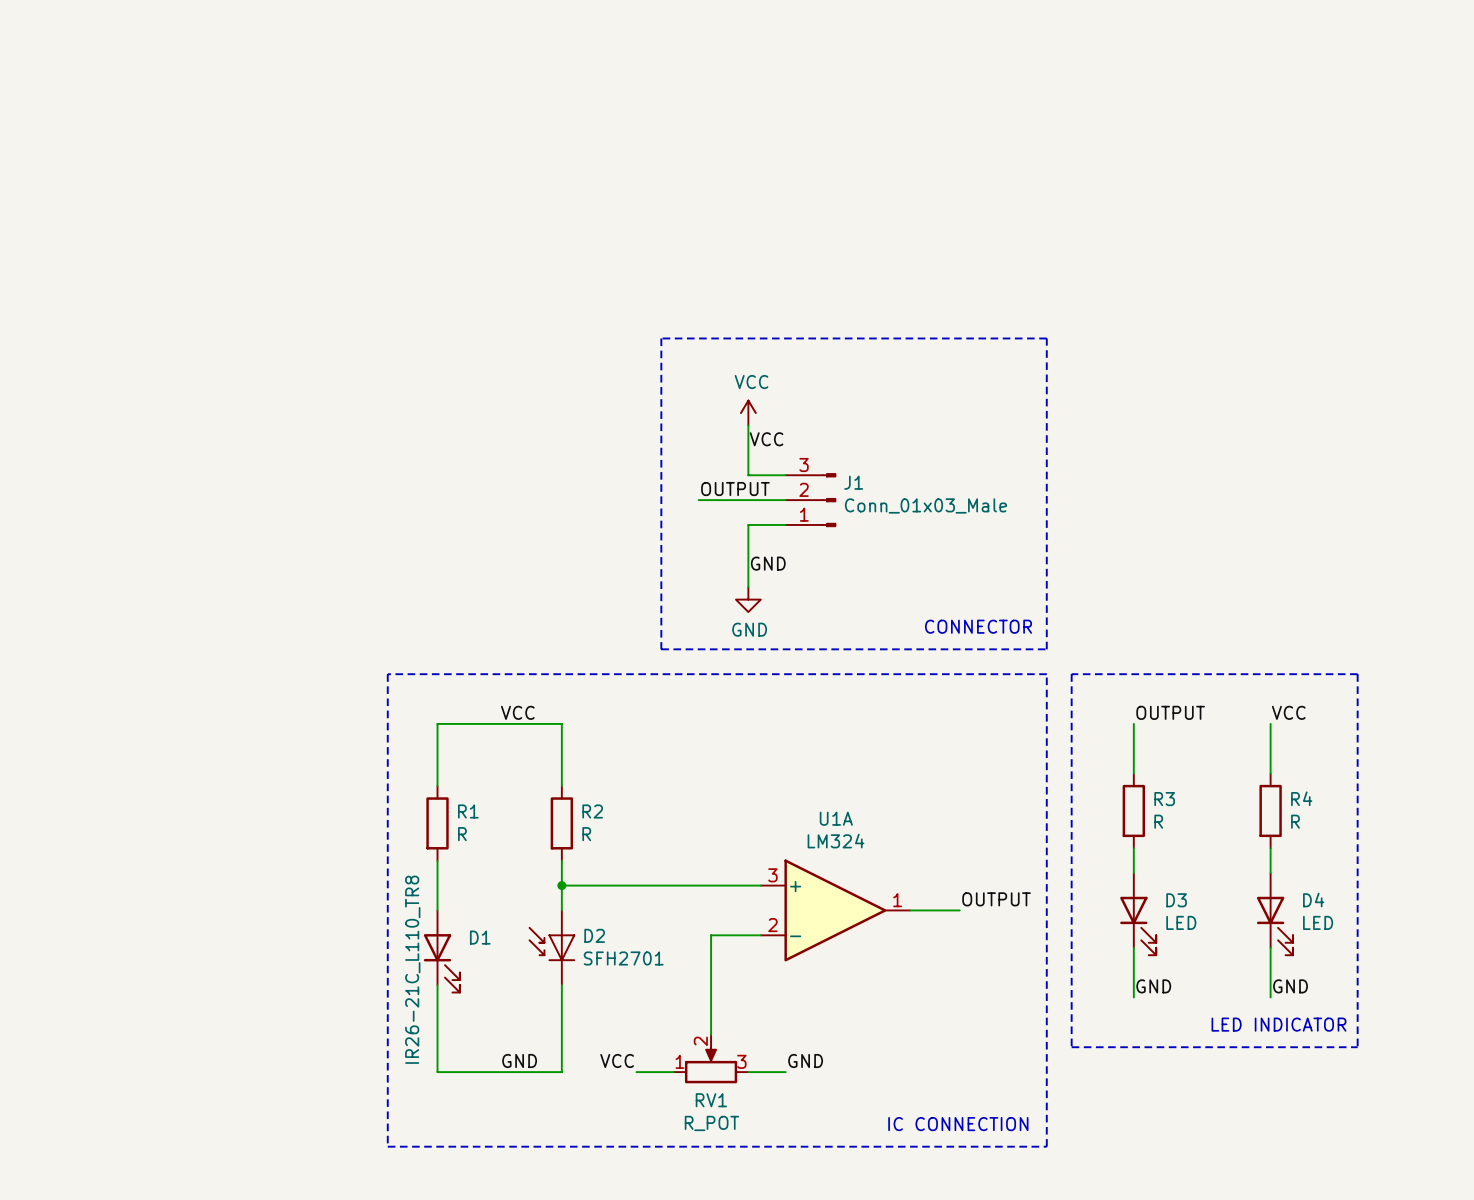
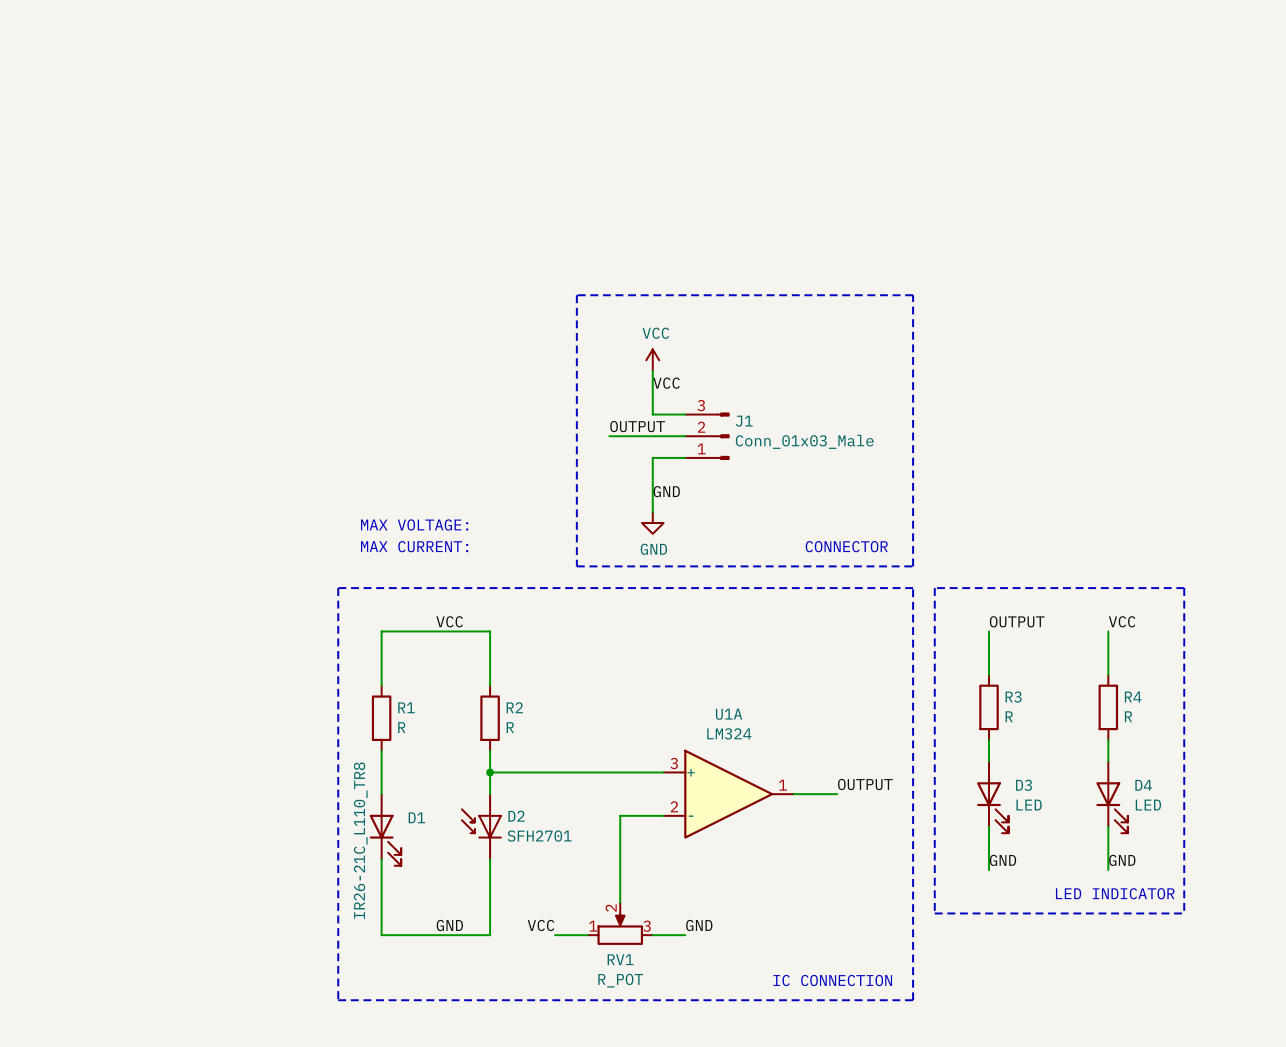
text: none -> MAX VOLTAGE: (414, 524)
text: none -> MAX CURRENT: (414, 546)

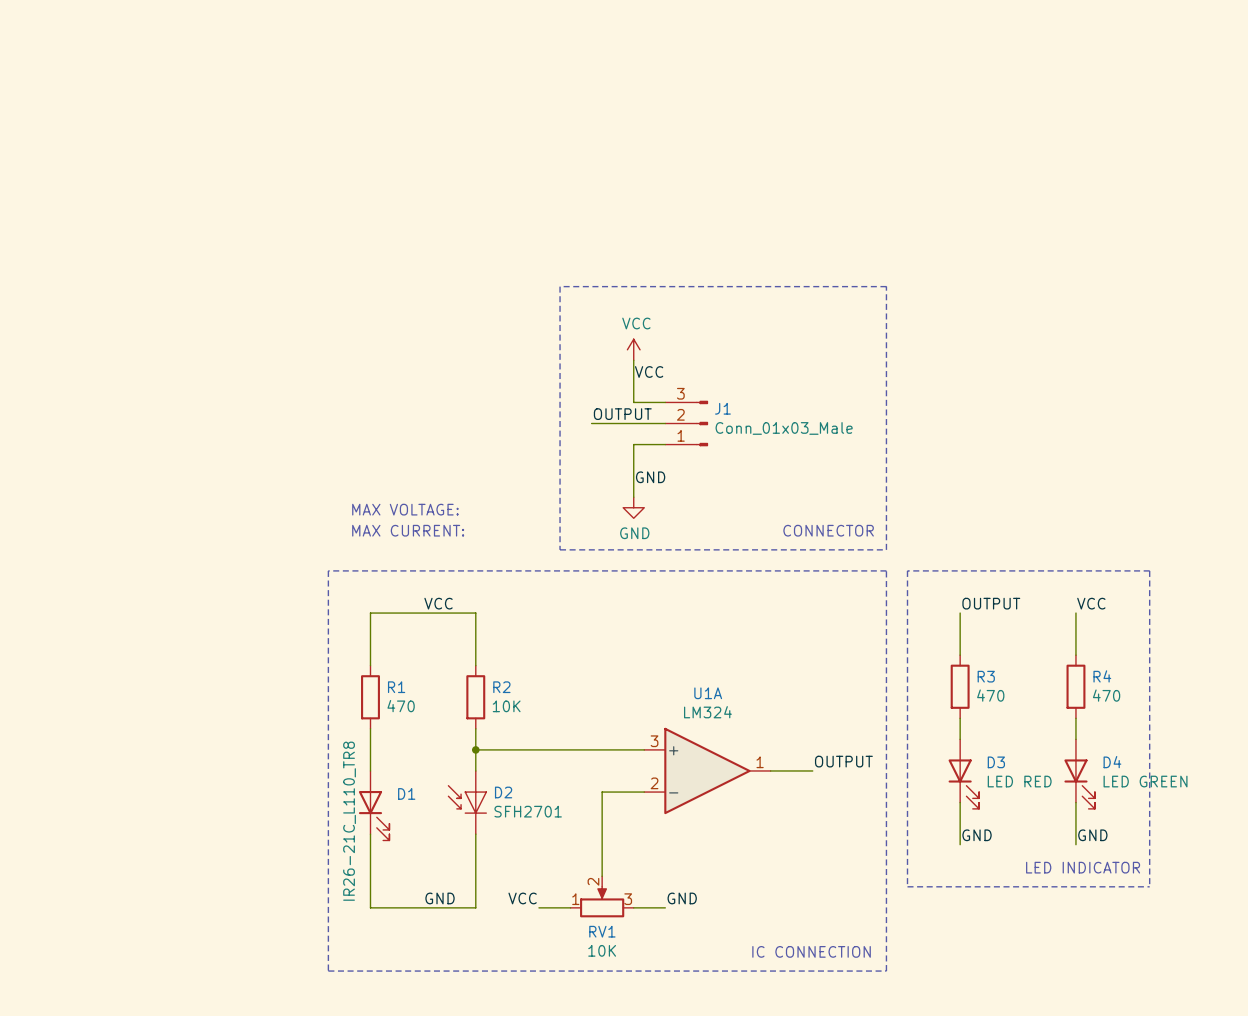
R3 value: R (1009, 716) -> 470 (990, 695)
R4 value: R (1128, 716) -> 470 (1106, 695)
R1 value: R (401, 727) -> 470 (401, 706)
R2 value: R (510, 727) -> 10K (506, 706)
D3 value: LED (1029, 805) -> LED RED (1019, 781)
D4 value: LED (1148, 805) -> LED GREEN (1145, 781)
RV1 value: R_POT (620, 980) -> 10K (602, 950)

